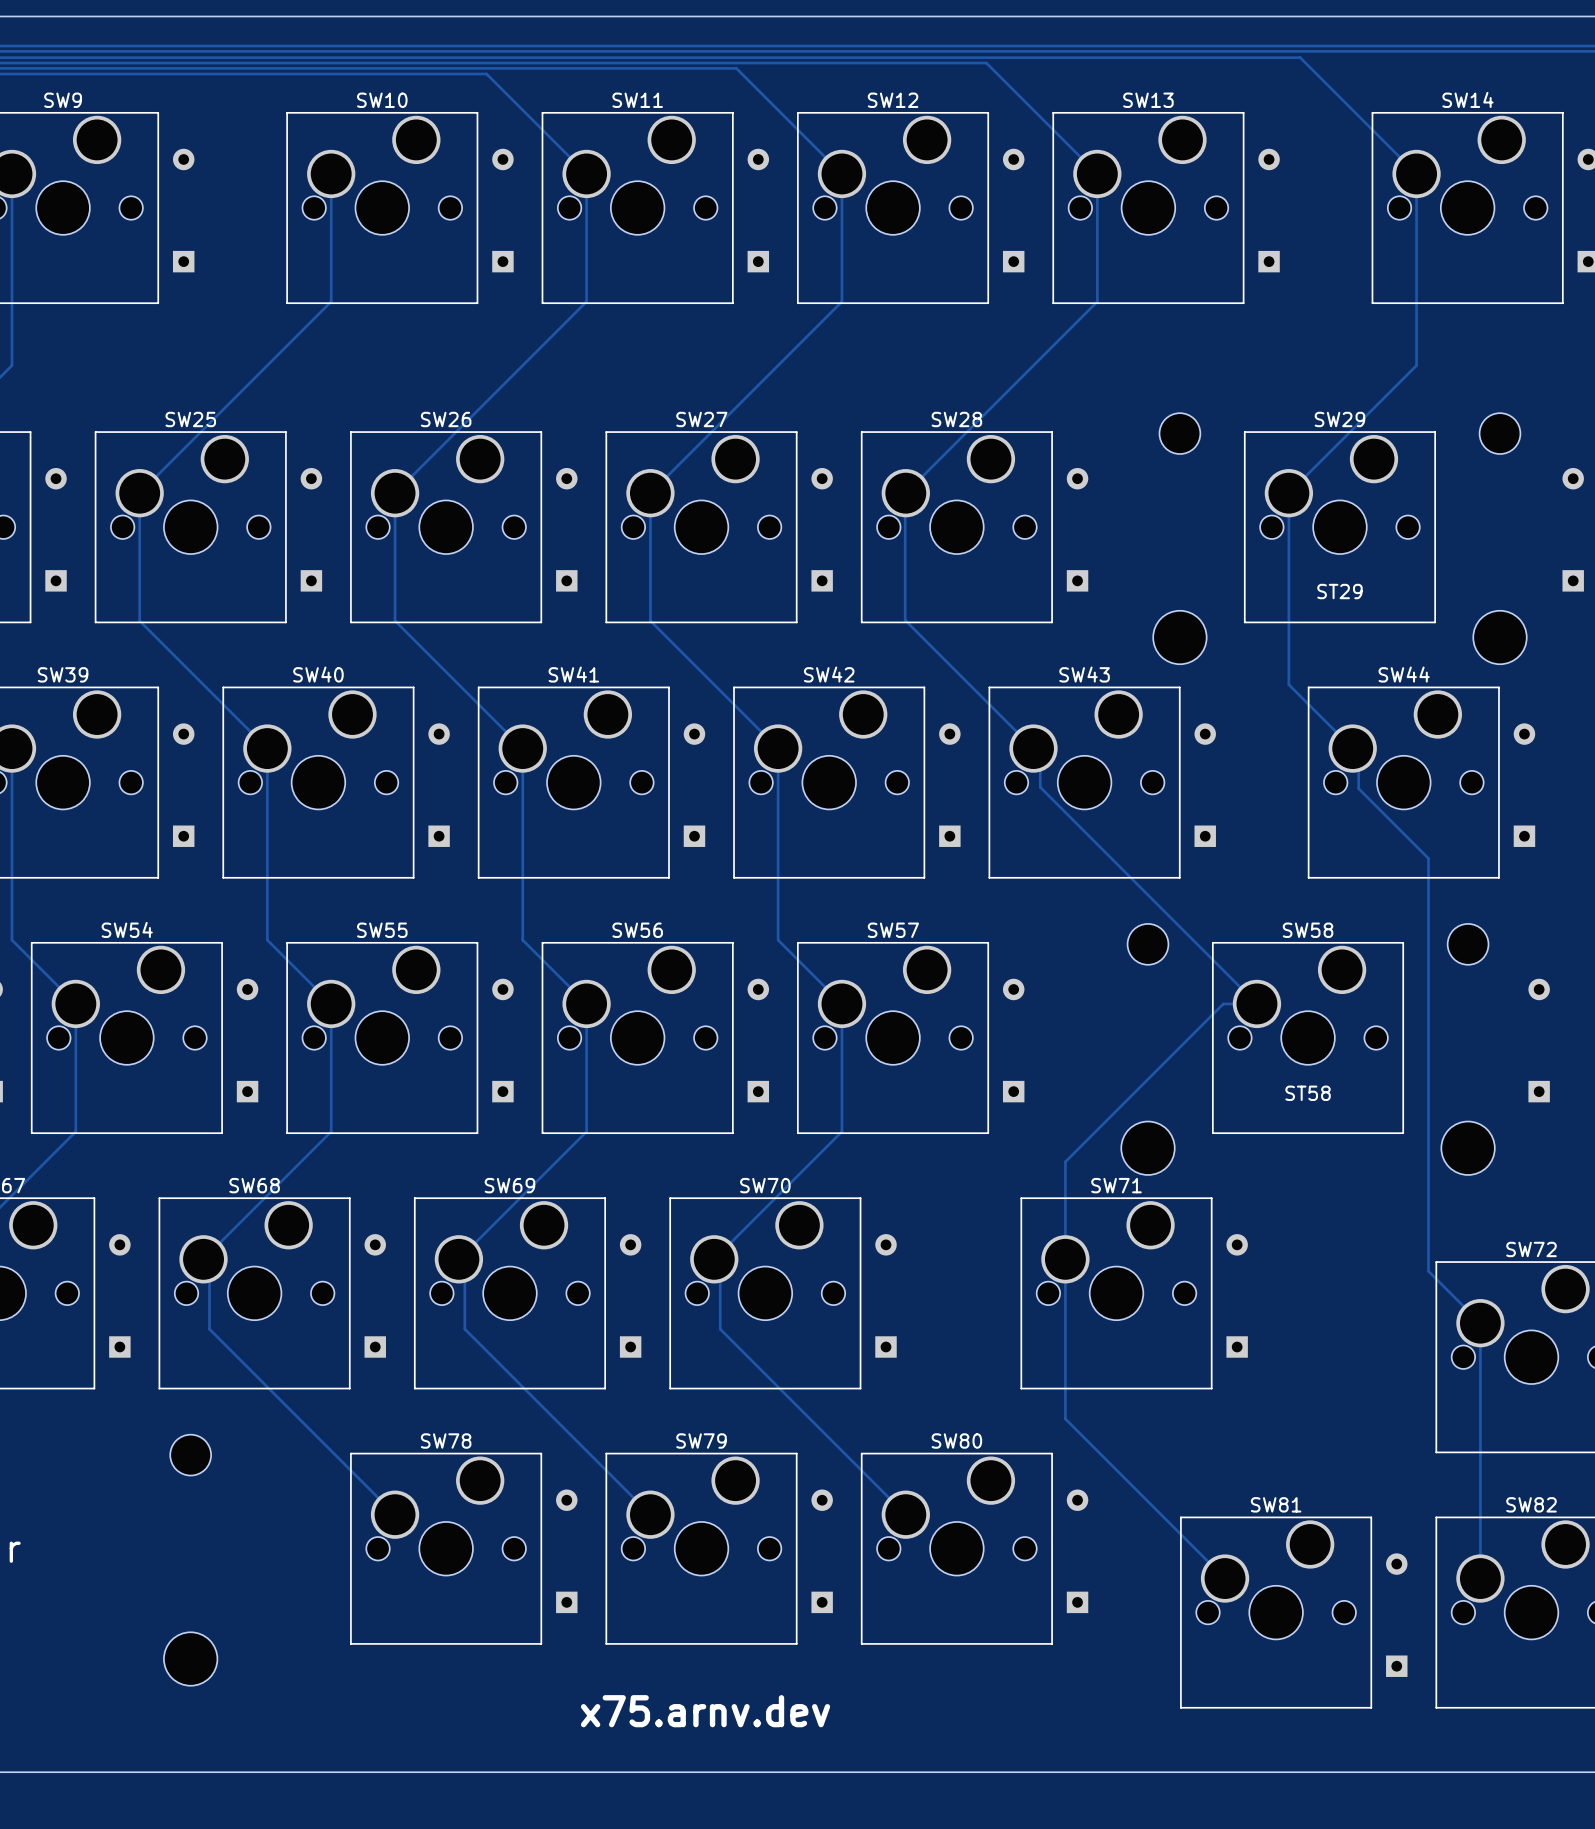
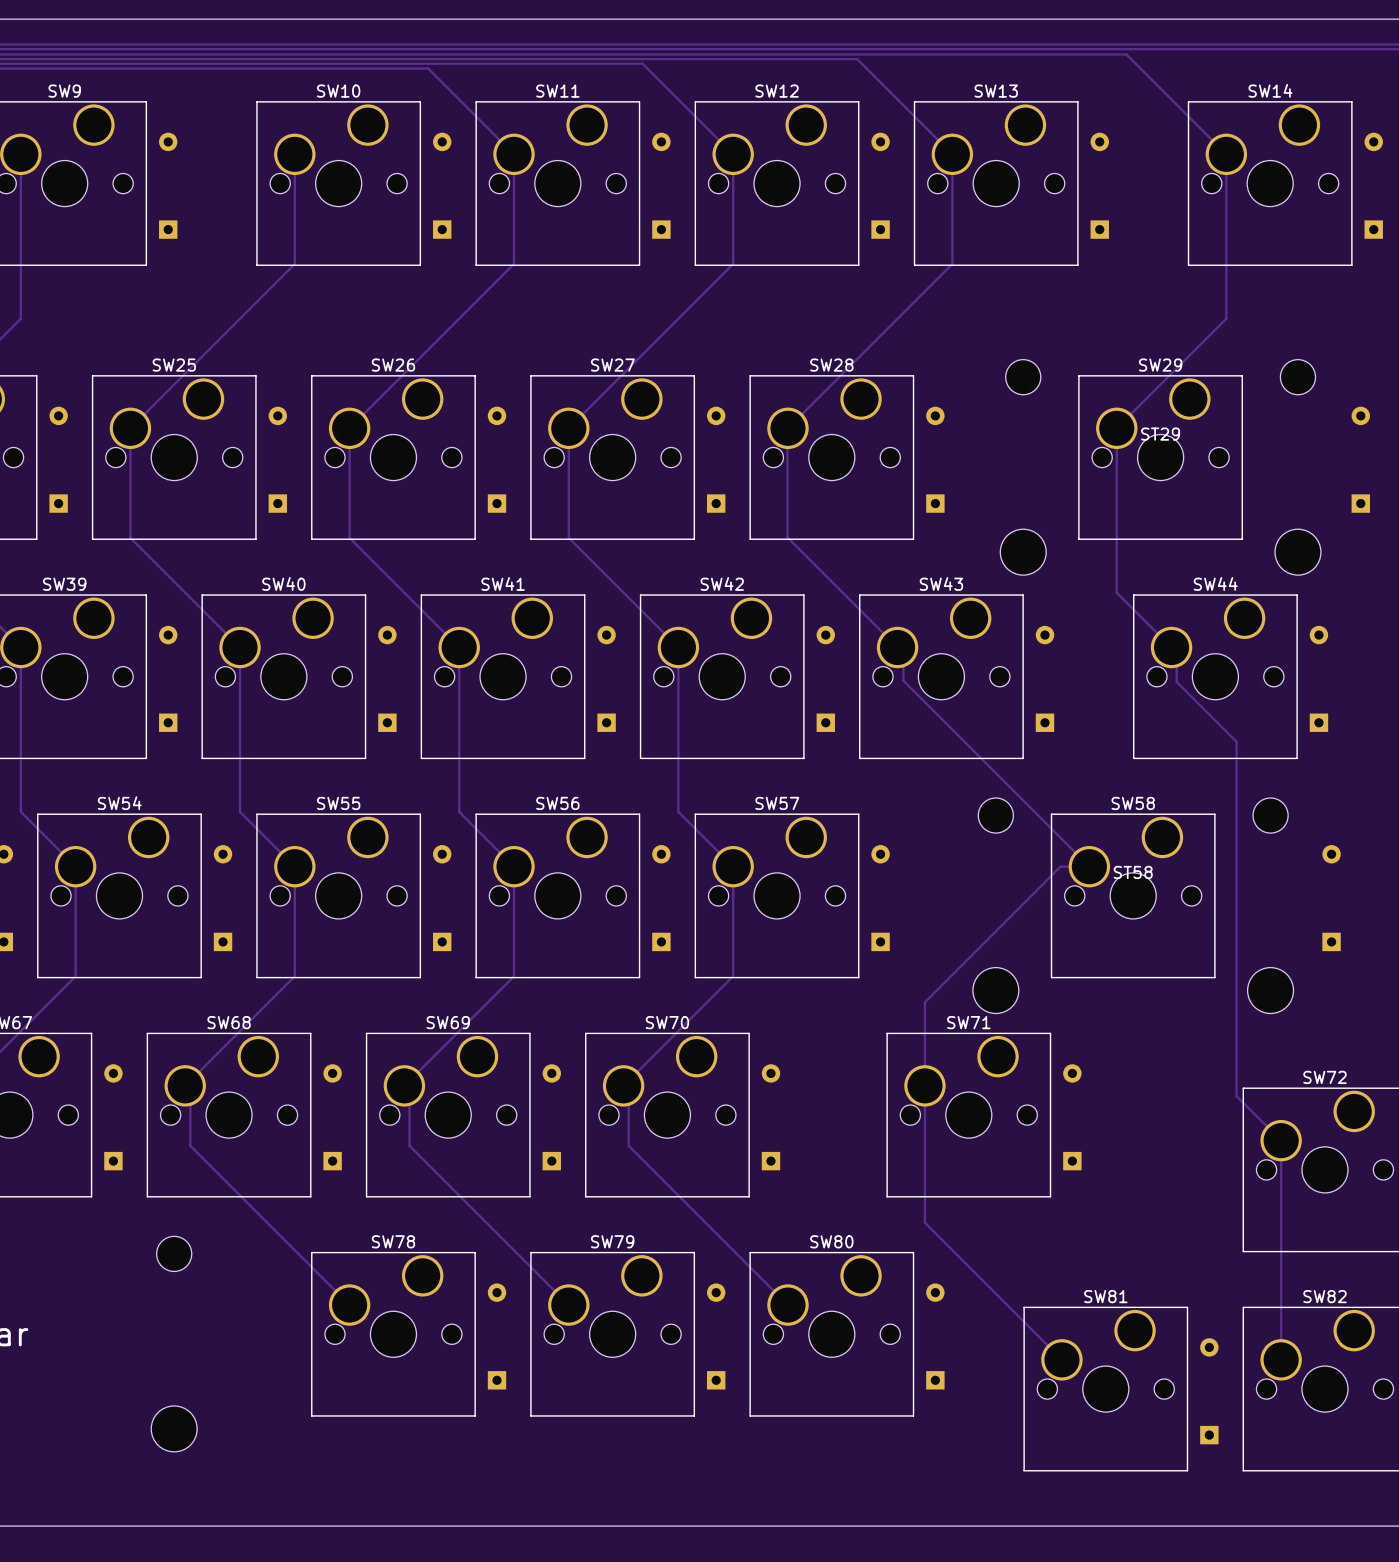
ST29 name position: ST29 (1339, 591) -> ST29 (1160, 434)
ST58 name position: ST58 (1308, 1093) -> ST58 (1133, 872)
text: x75.arnv.dev (705, 1711) -> none

